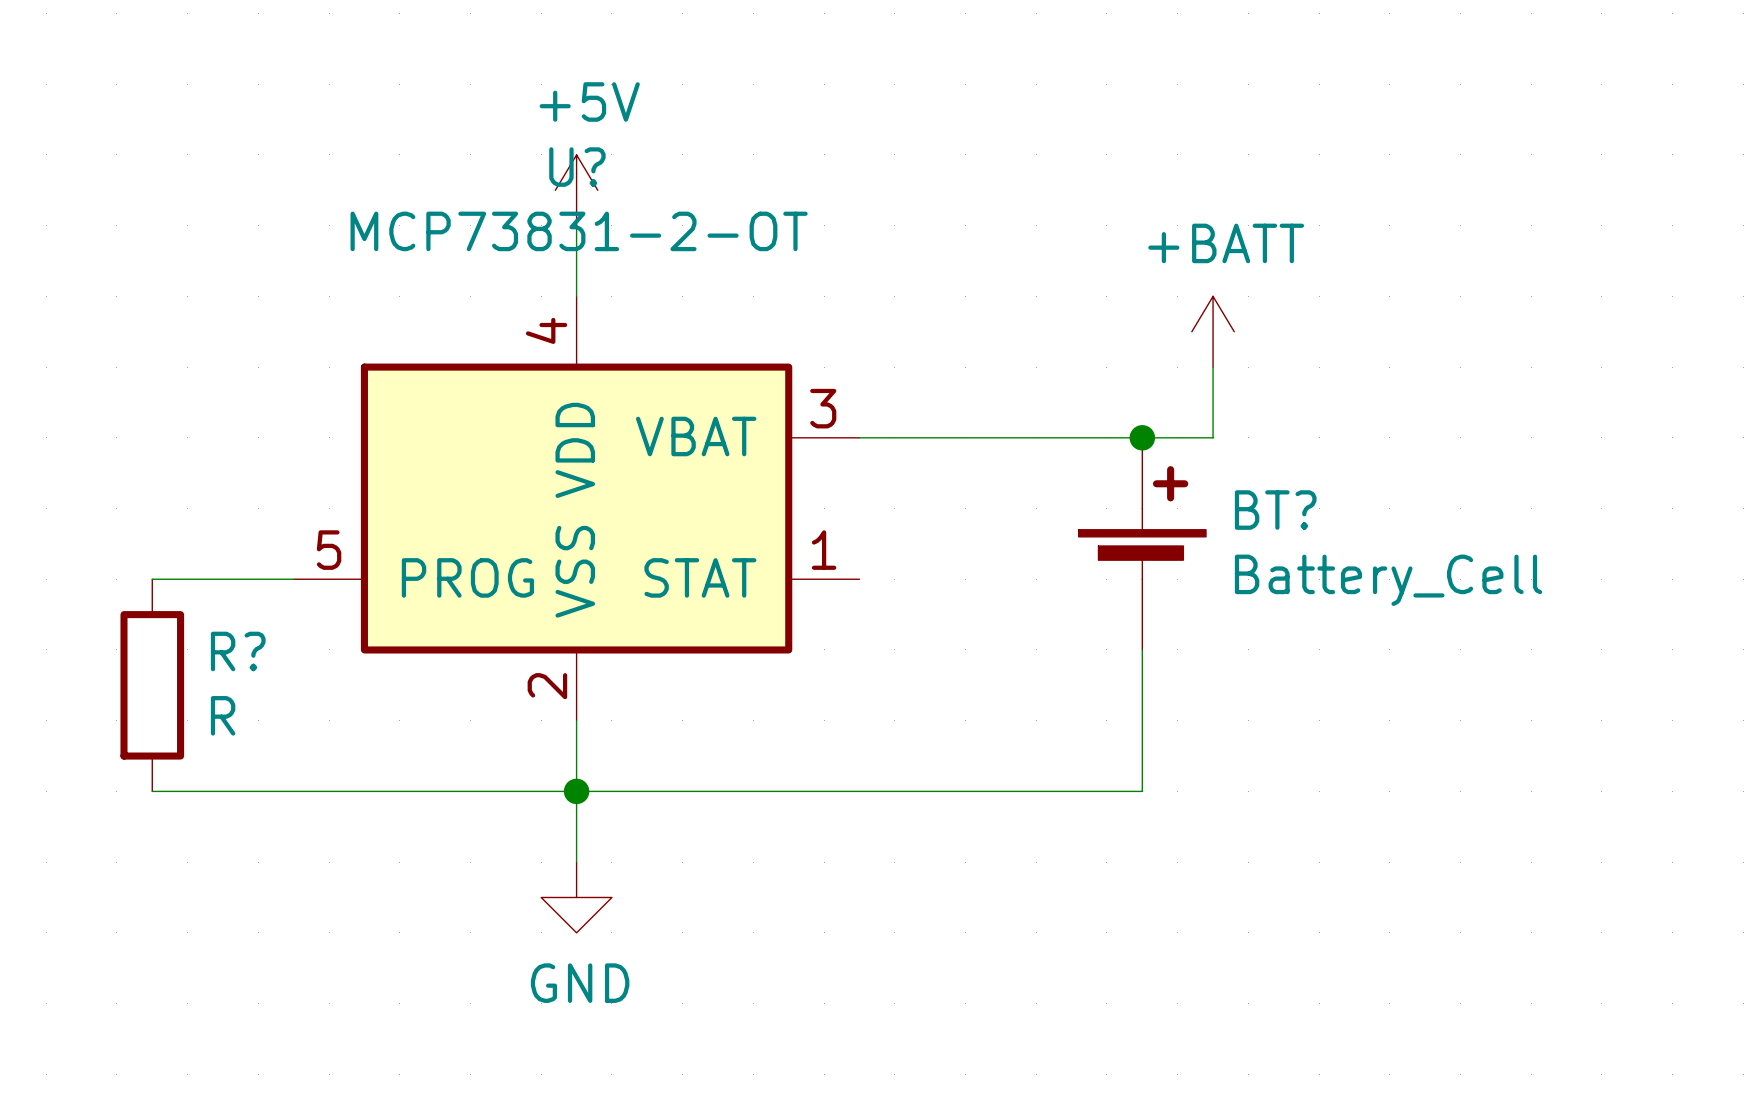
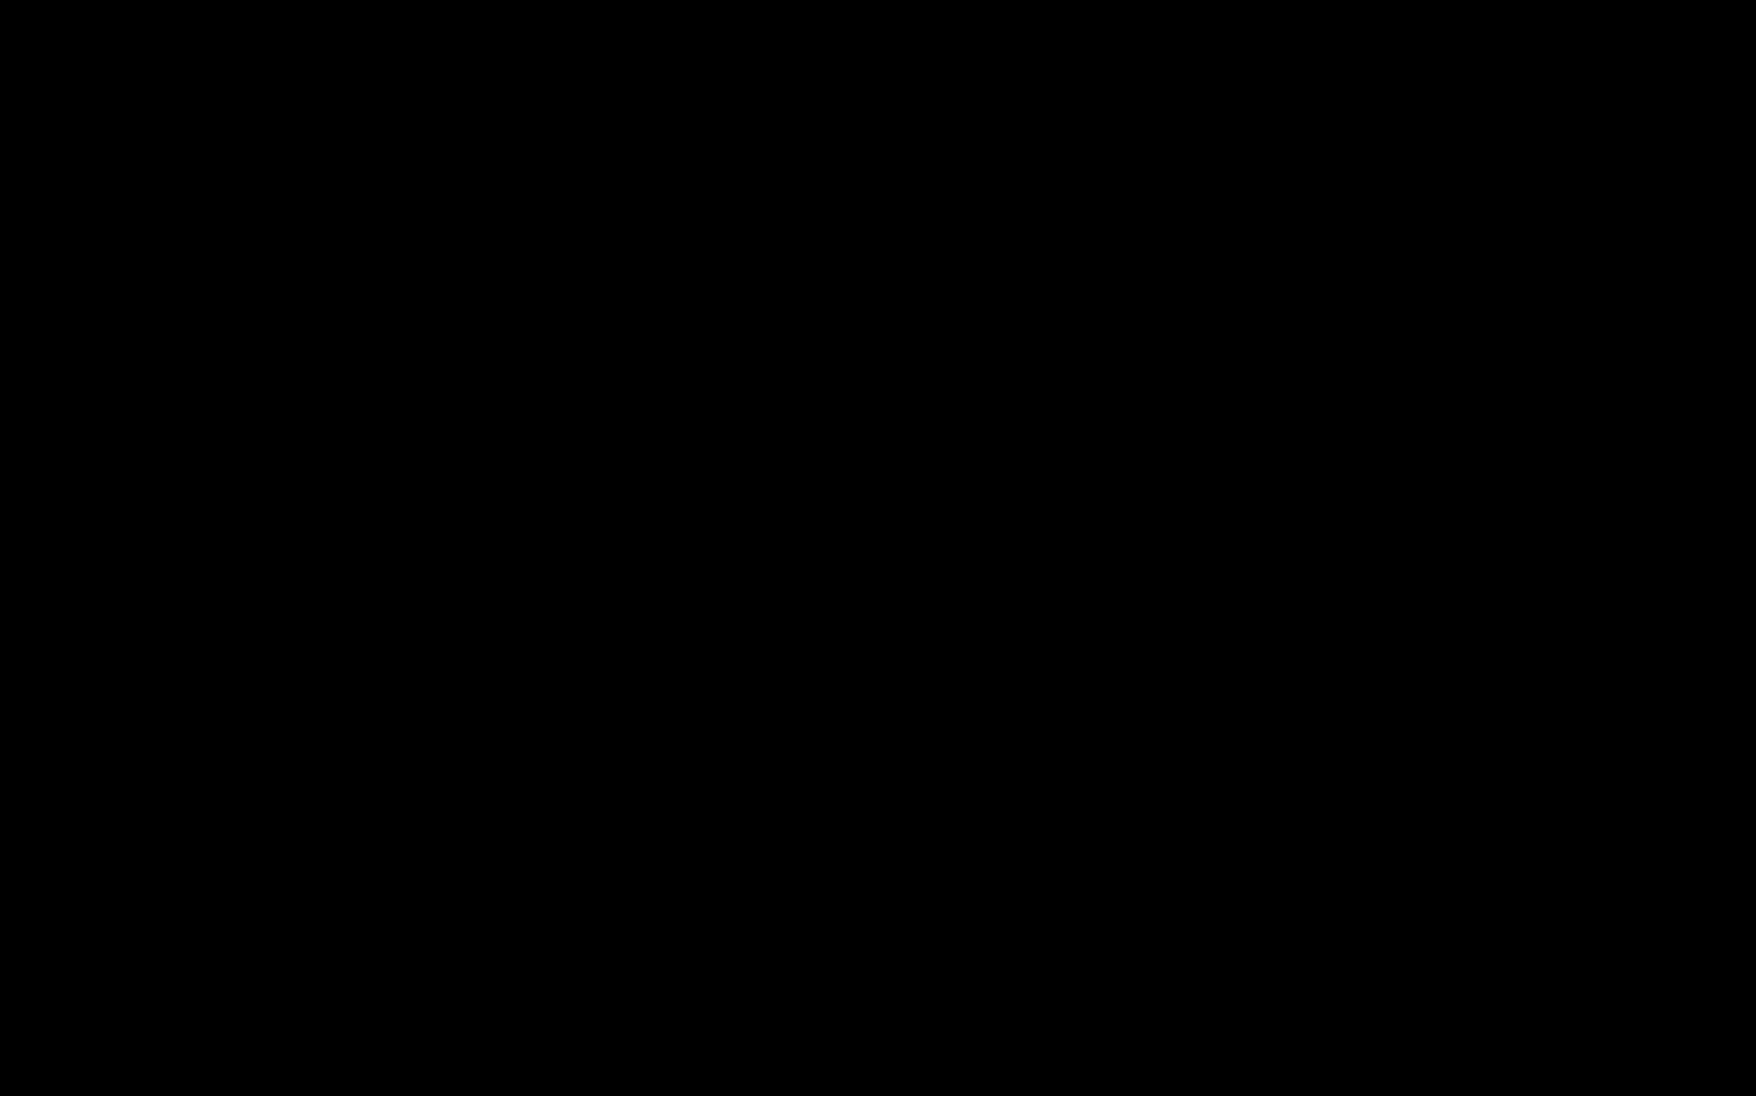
power symbol: +5V (576, 190) -> none
wire: (576, 225) (576, 296) -> none
power symbol: +BATT (1213, 331) -> none
wire: (1213, 367) (1213, 437) (859, 437) -> none
junction: (1142, 437) -> none
U?: MCP73831-2-OT (576, 508) -> none
BT?: Battery_Cell (1142, 543) -> none
wire: (152, 579) (293, 579) -> none
wire: (1142, 649) (1142, 791) (152, 791) -> none
R?: R (152, 685) -> none
wire: (576, 720) (576, 862) -> none
junction: (576, 791) -> none
power symbol: GND (576, 897) -> none

